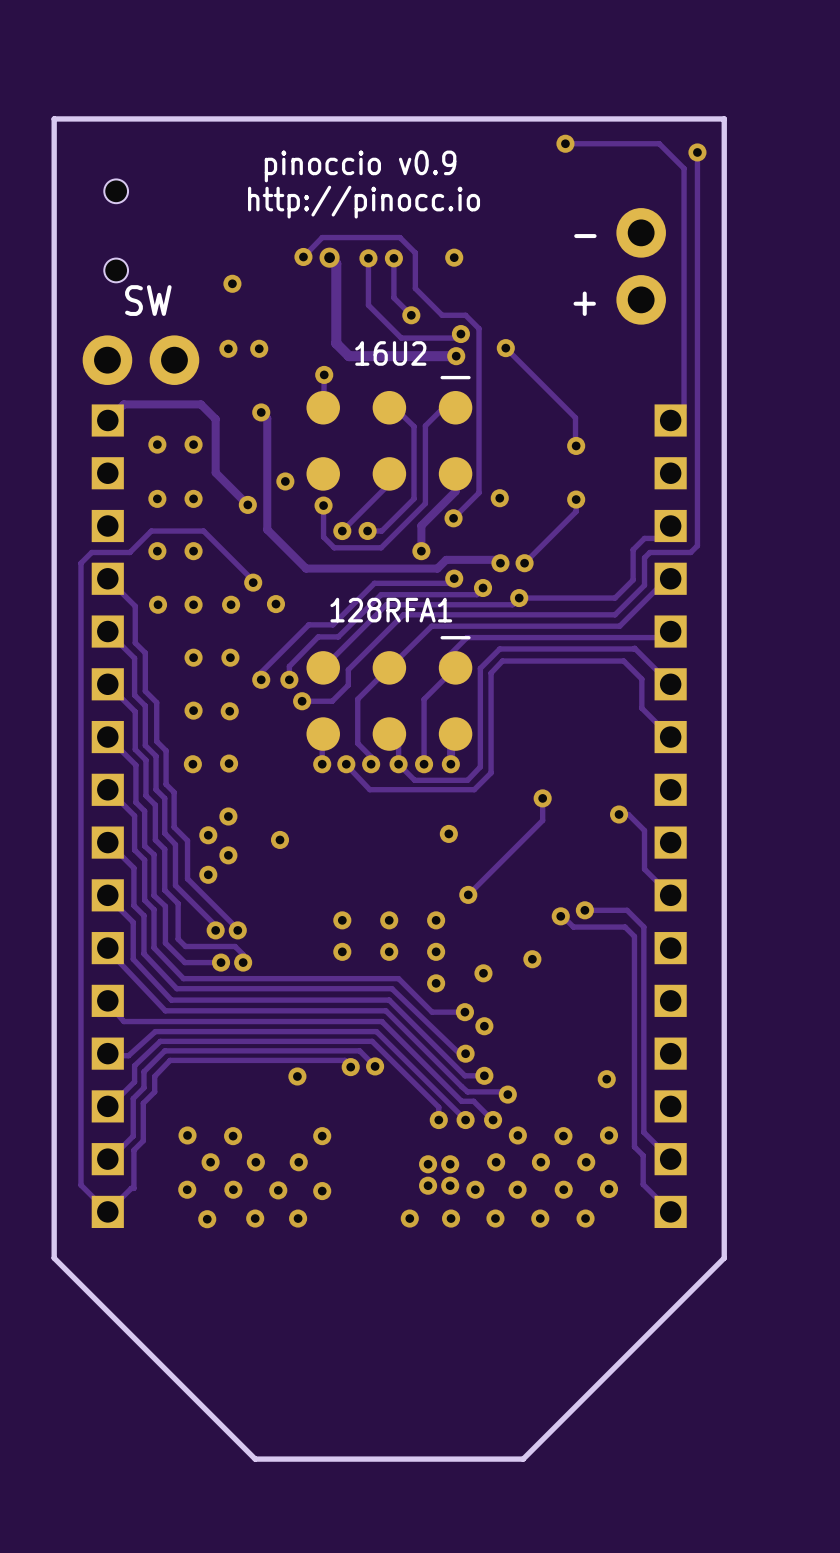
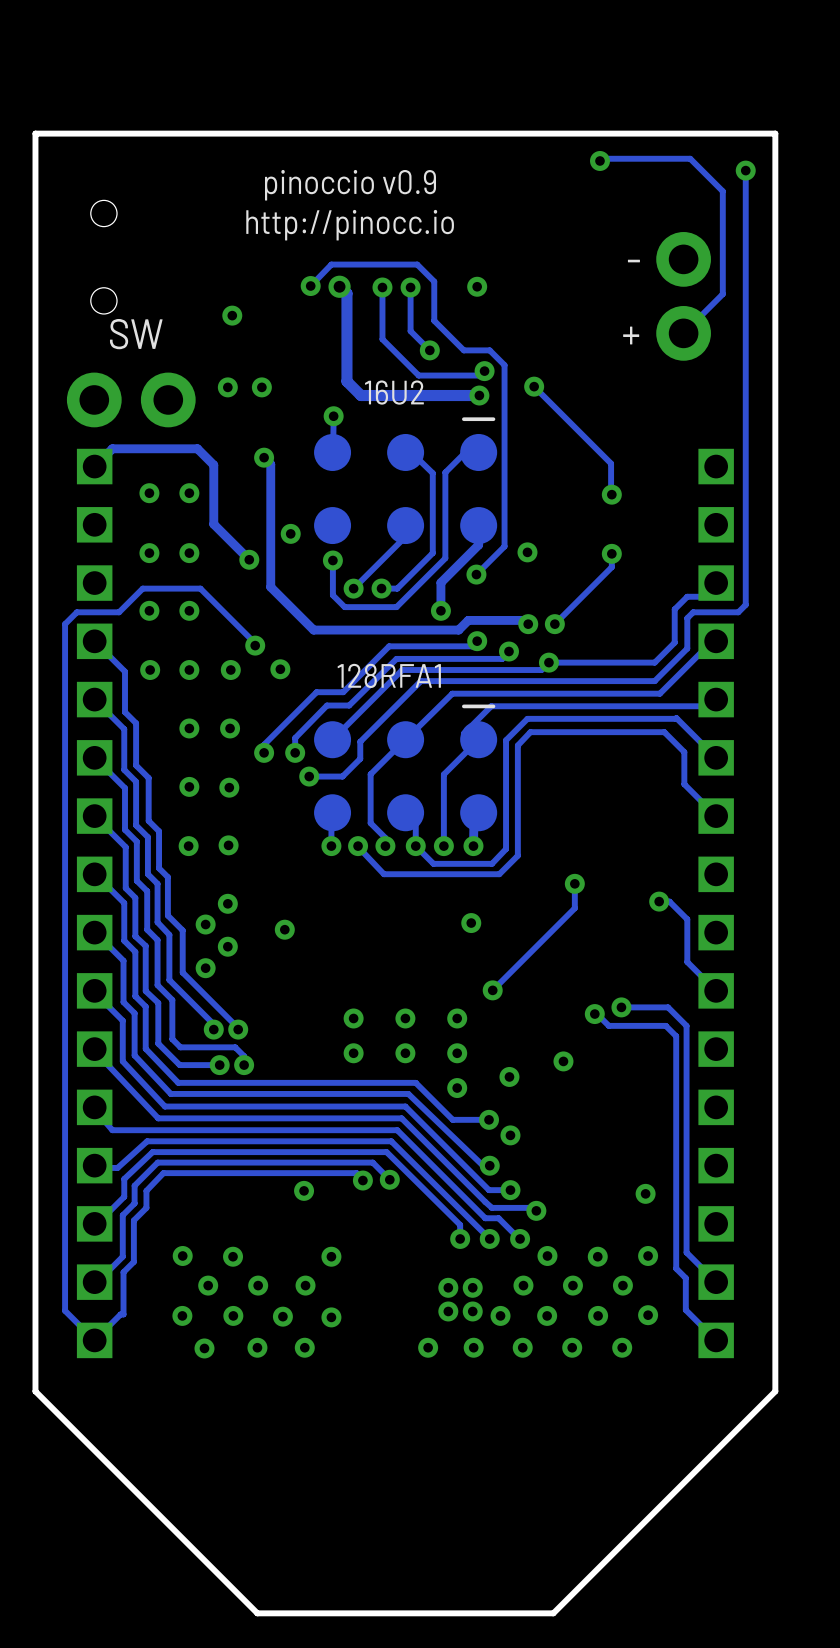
track: none -> (594, 158) (690, 158) (722, 191) (722, 294) (683, 333)
track: (565, 143) (659, 143) (684, 168) (684, 407) (670, 420) -> none

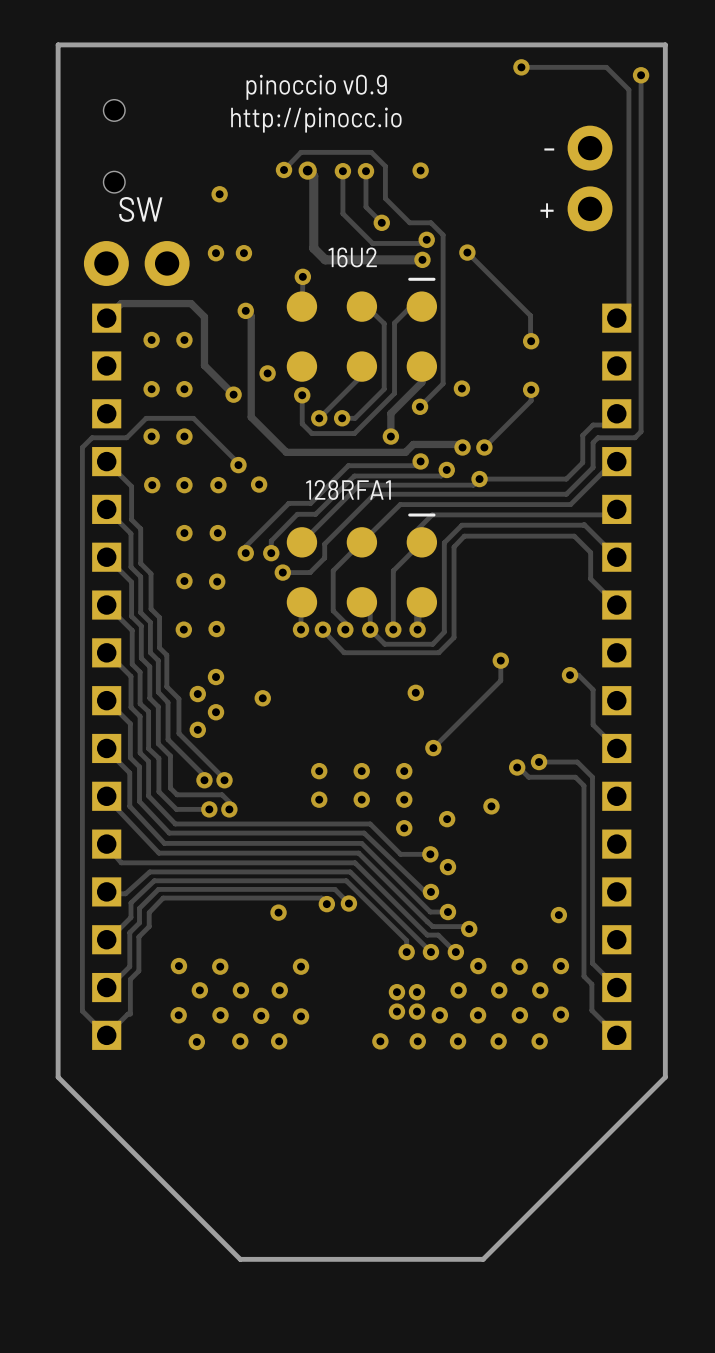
track: (594, 158) (690, 158) (722, 191) (722, 294) (683, 333) -> none
track: none -> (521, 67) (606, 67) (628, 89) (628, 306) (616, 318)

